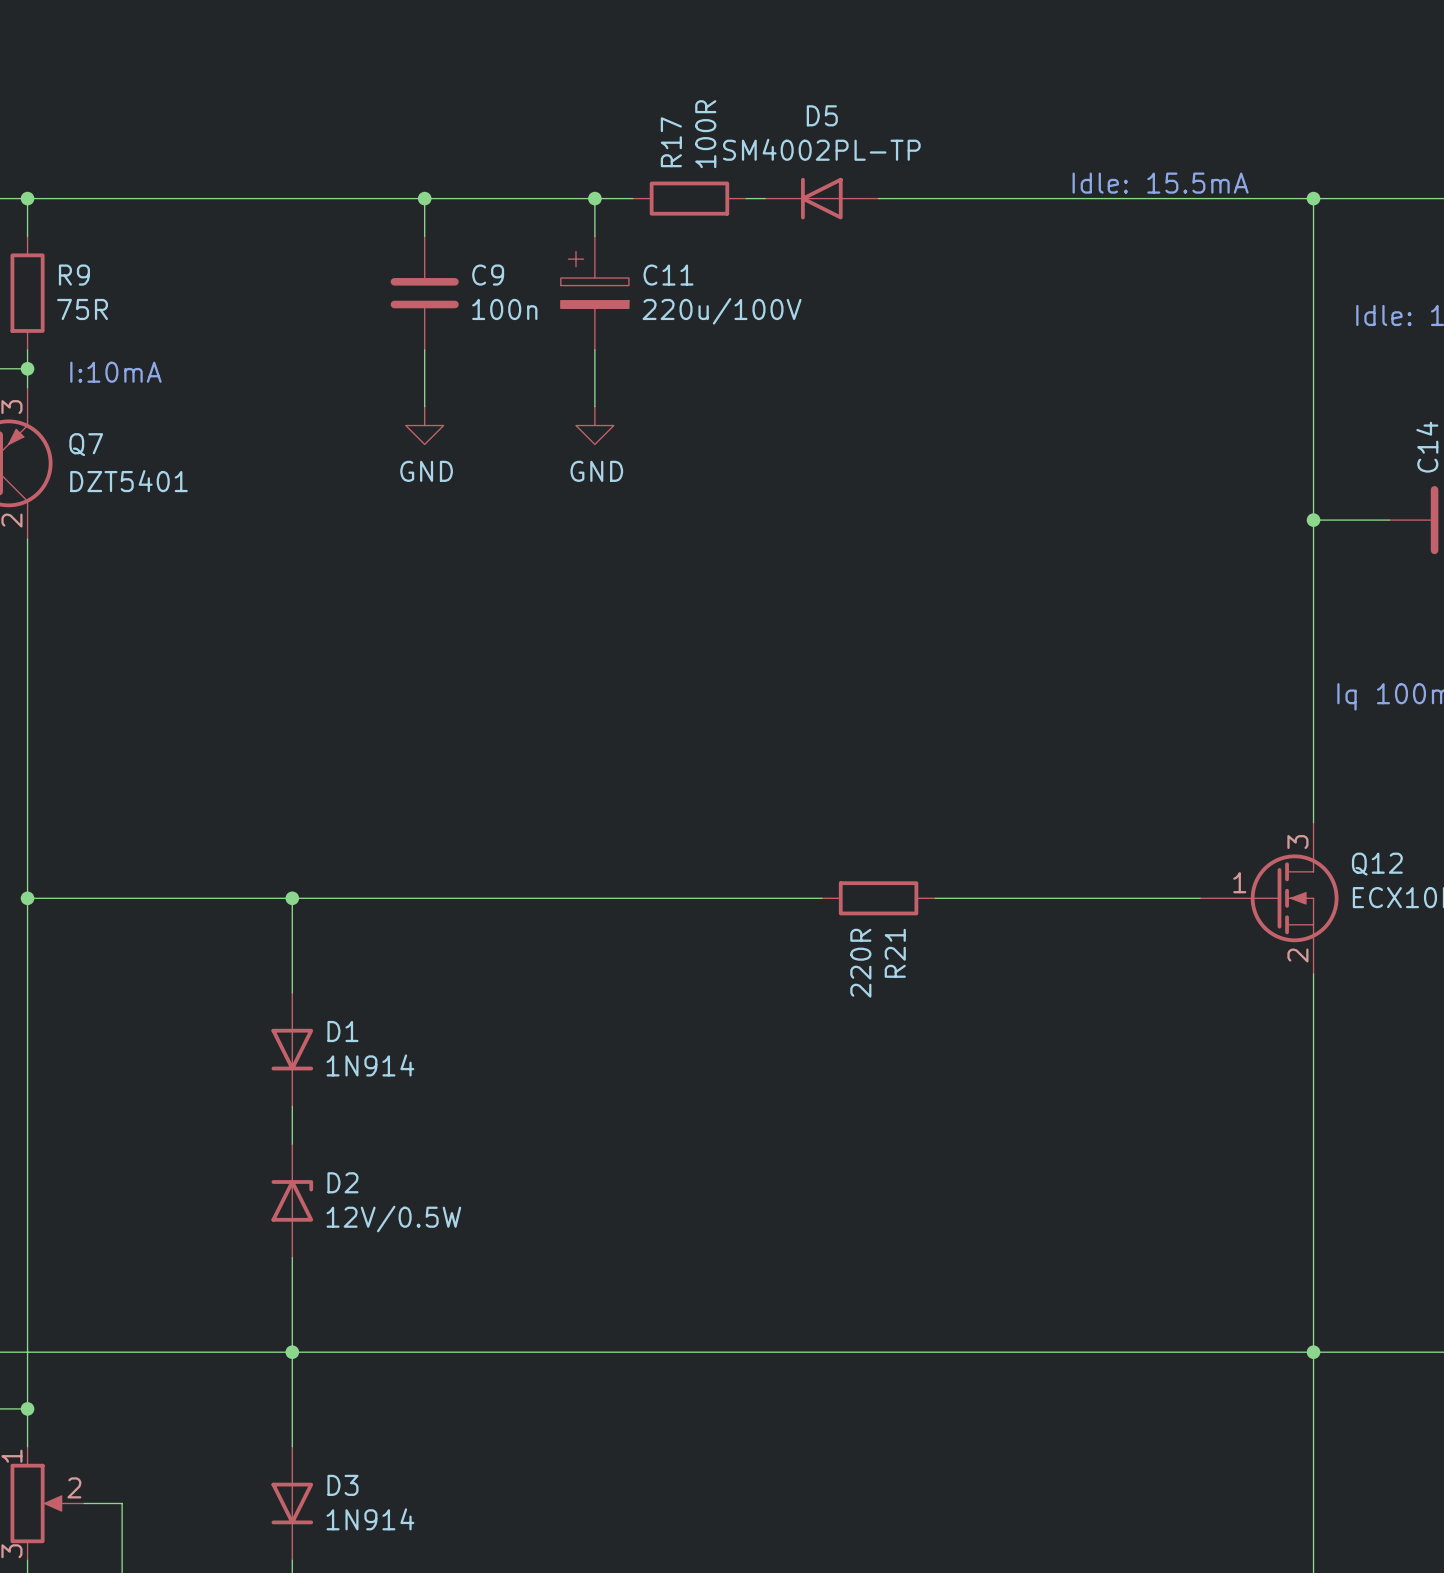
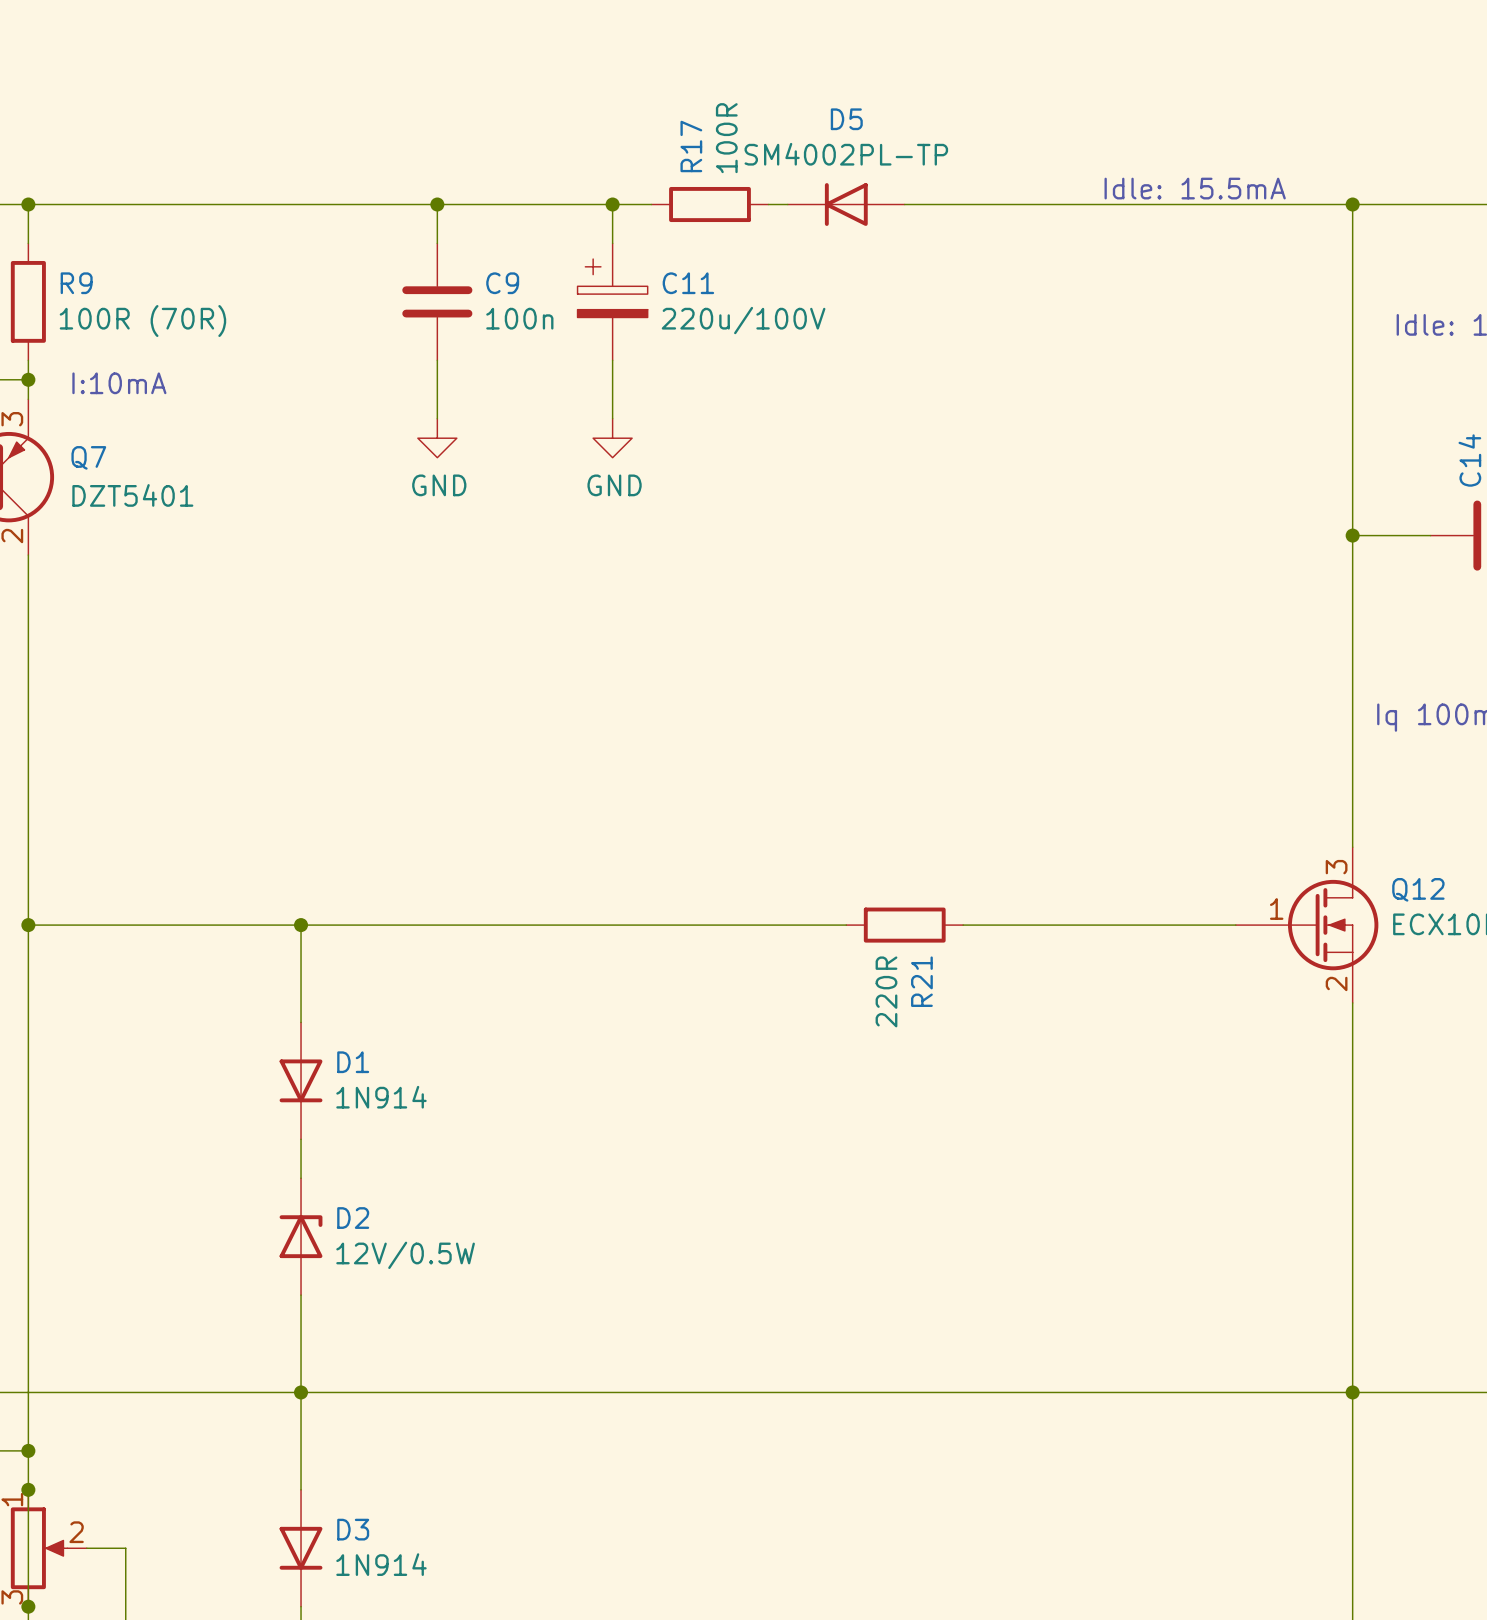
R9 value: 75R (82, 309) -> 100R (70R) (142, 321)
wire: none -> (28, 1489) (28, 1606)
junction: none -> (28, 1489)
junction: none -> (28, 1606)

